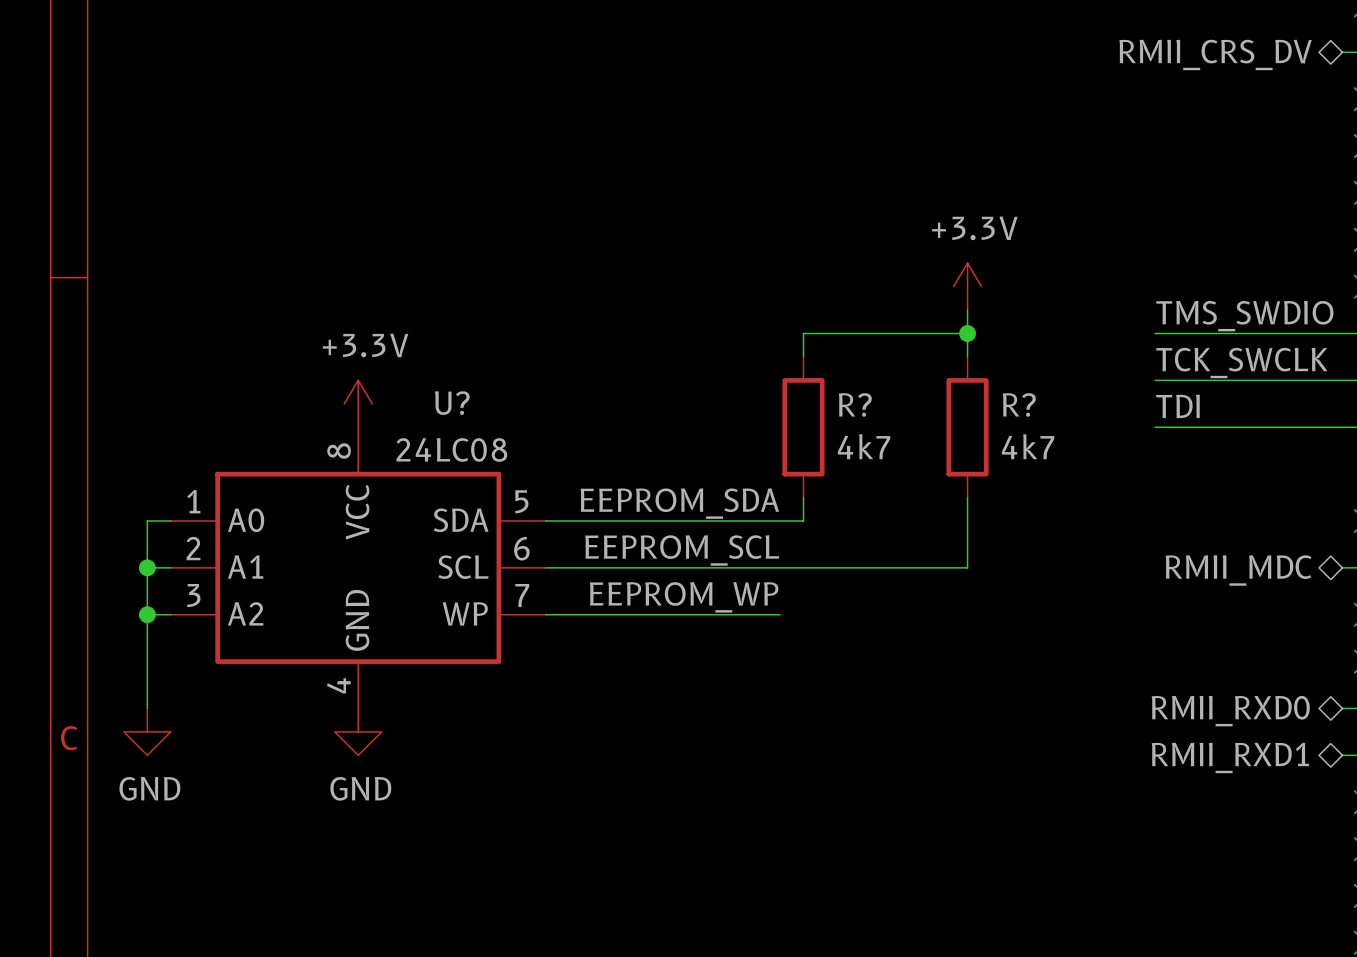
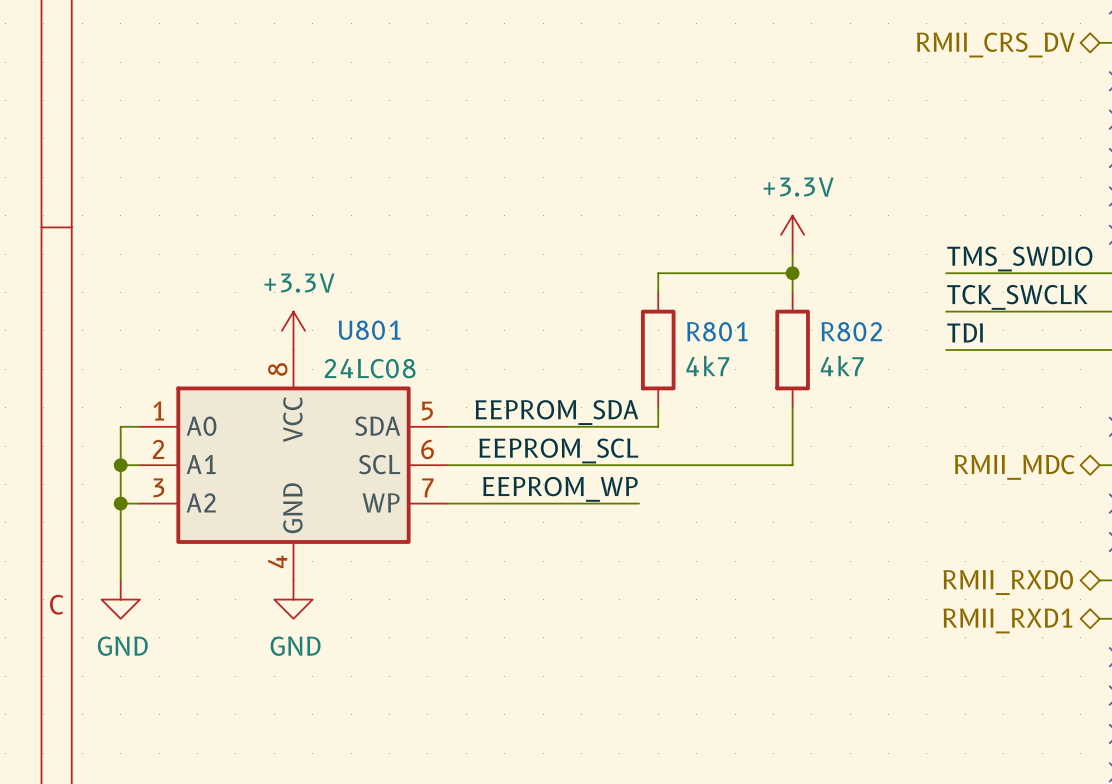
U? name: U? (452, 403) -> U801 (369, 330)
R? name: R? (855, 404) -> R801 (717, 331)
R? name: R? (1019, 404) -> R802 (851, 331)

